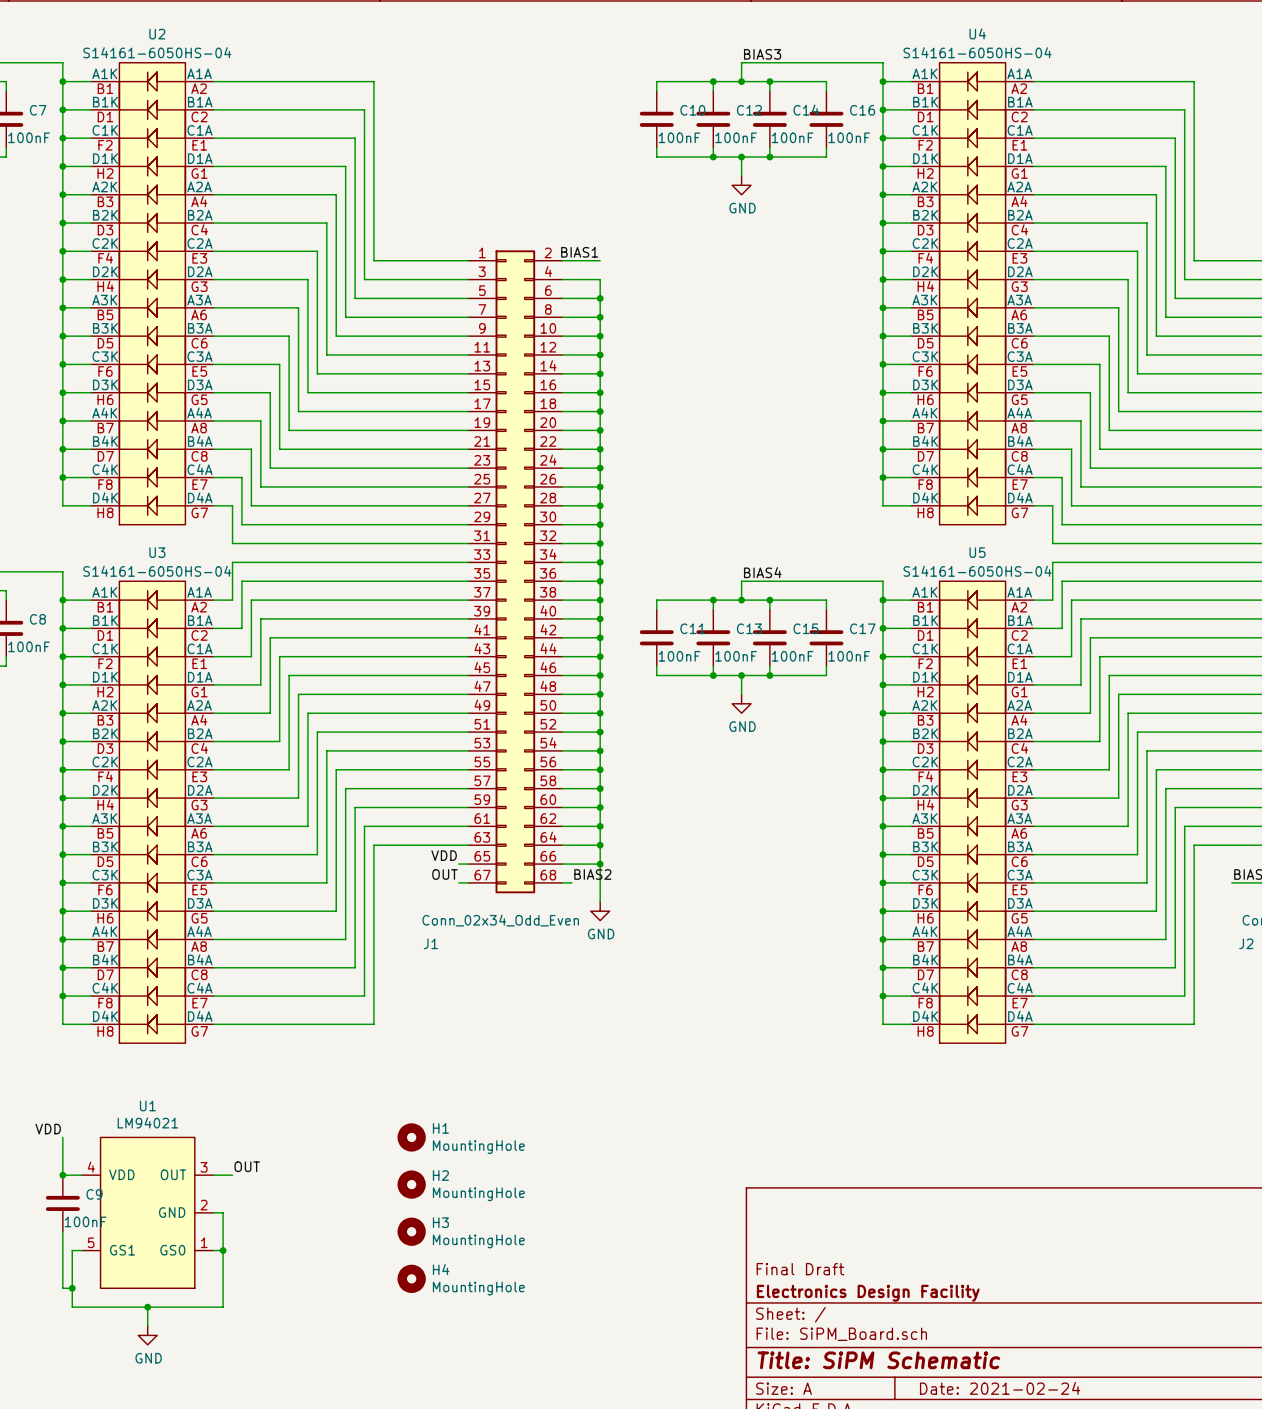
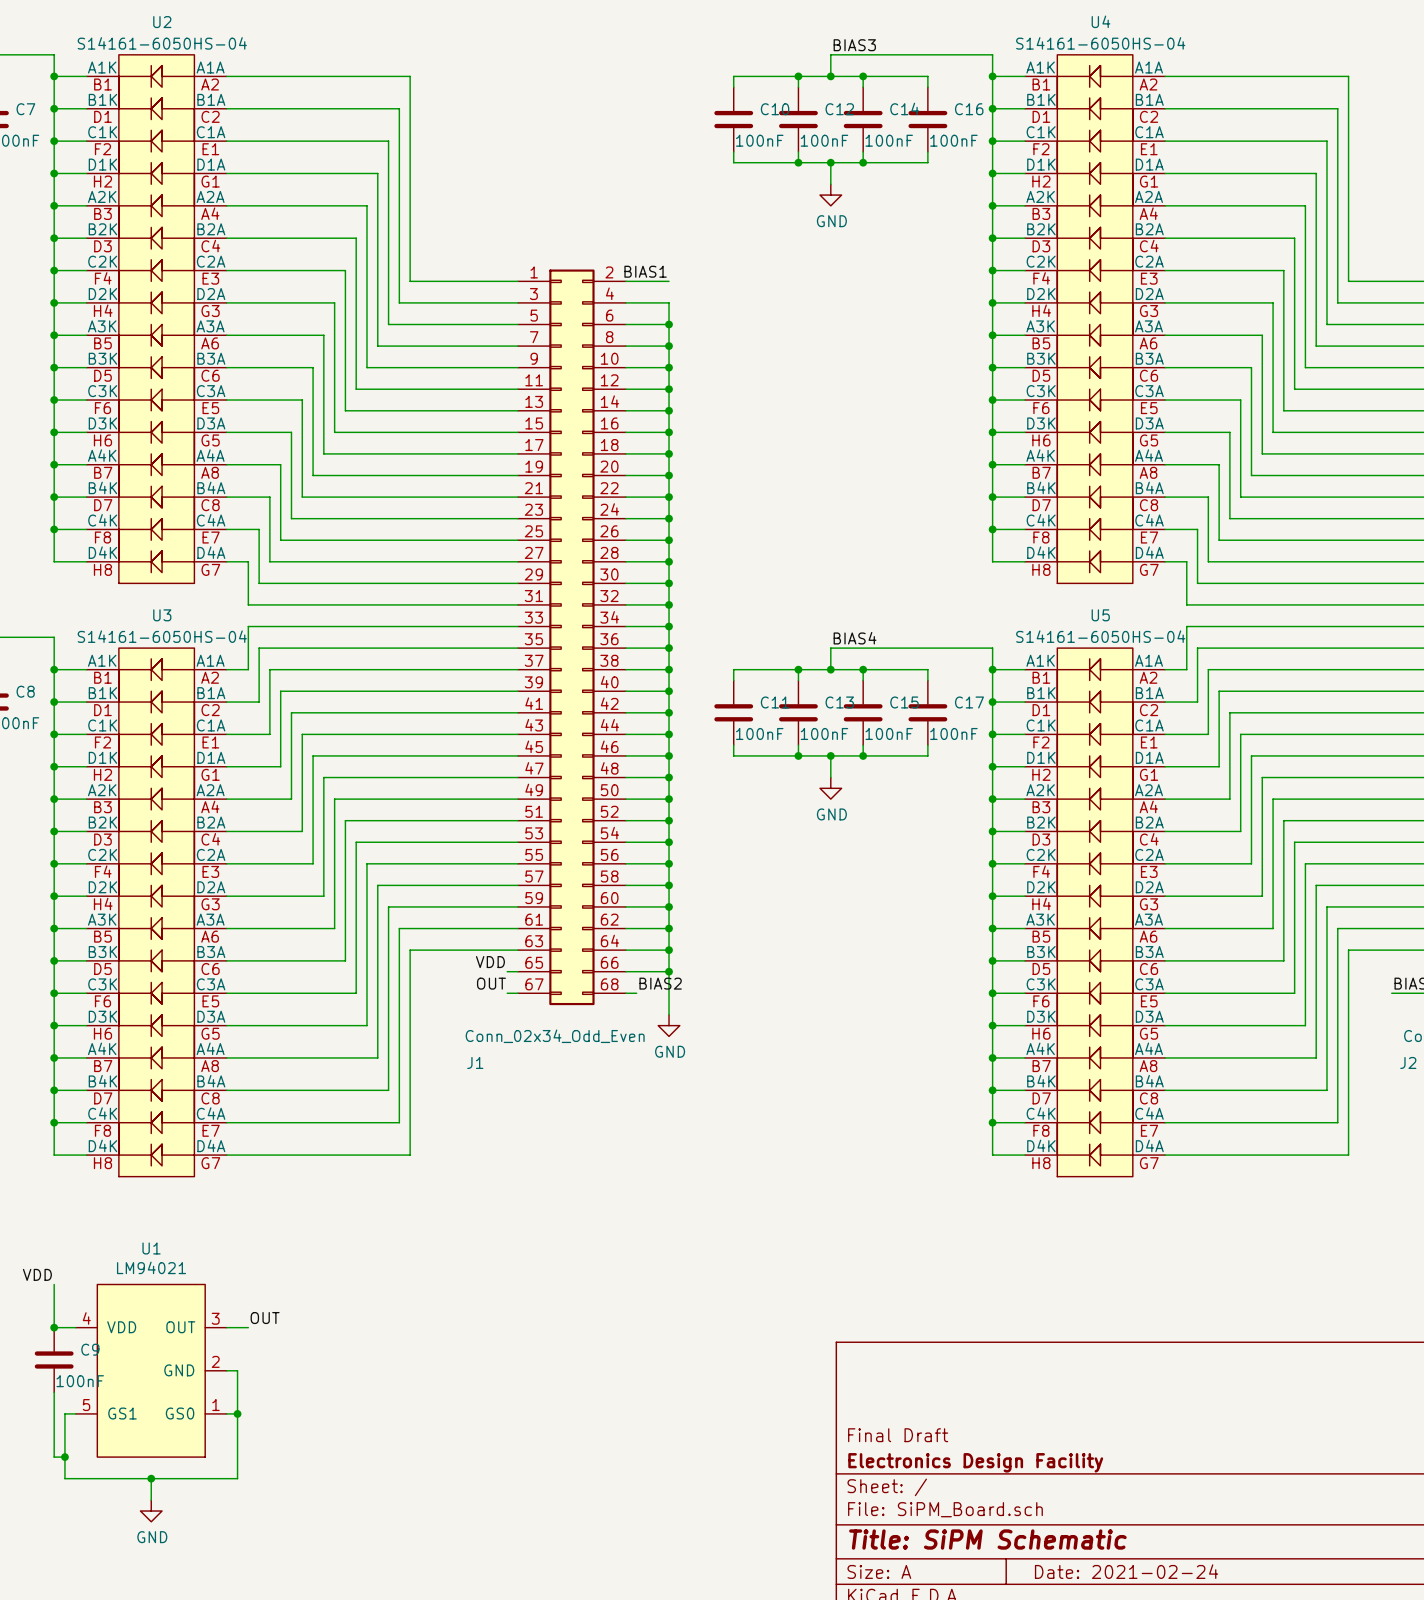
H1: MountingHole (411, 1137) -> none
H2: MountingHole (411, 1184) -> none
H3: MountingHole (411, 1231) -> none
H4: MountingHole (411, 1278) -> none

